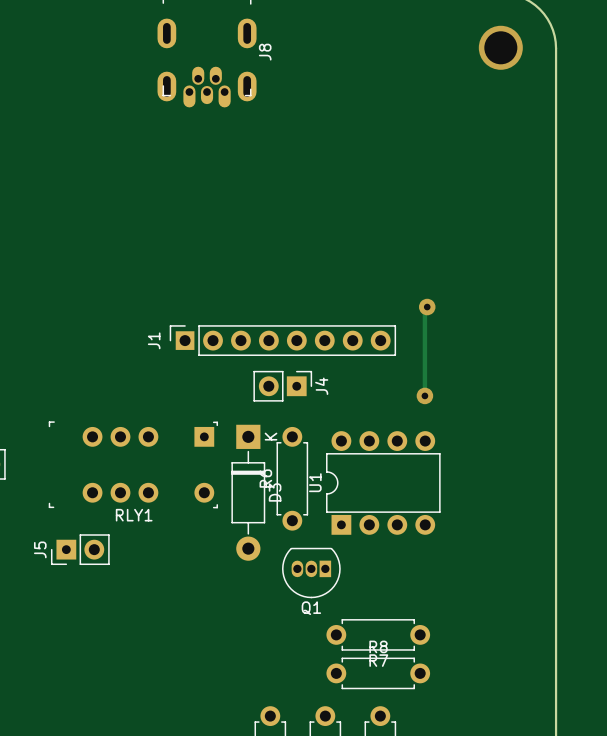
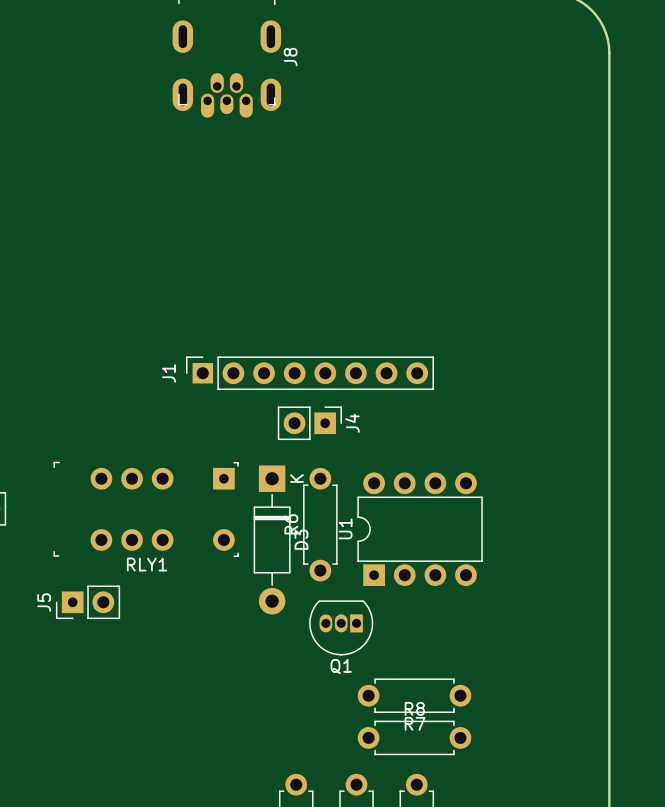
via: (500, 47) -> none
track: (427, 307) (424, 309) (424, 395) -> none
via: (427, 307) -> none
via: (424, 395) -> none

